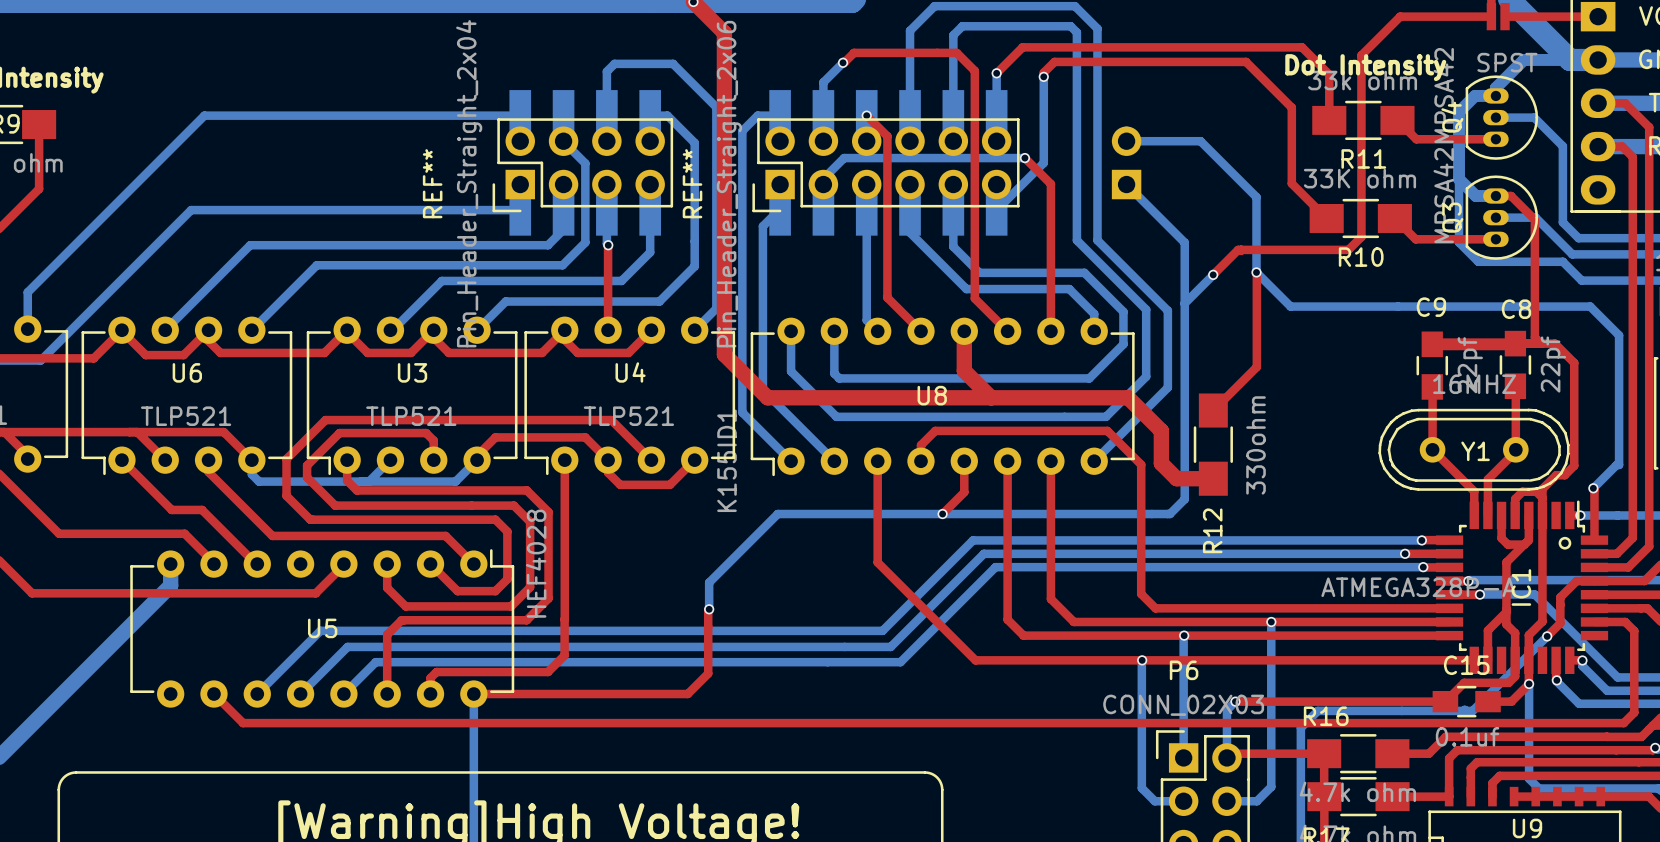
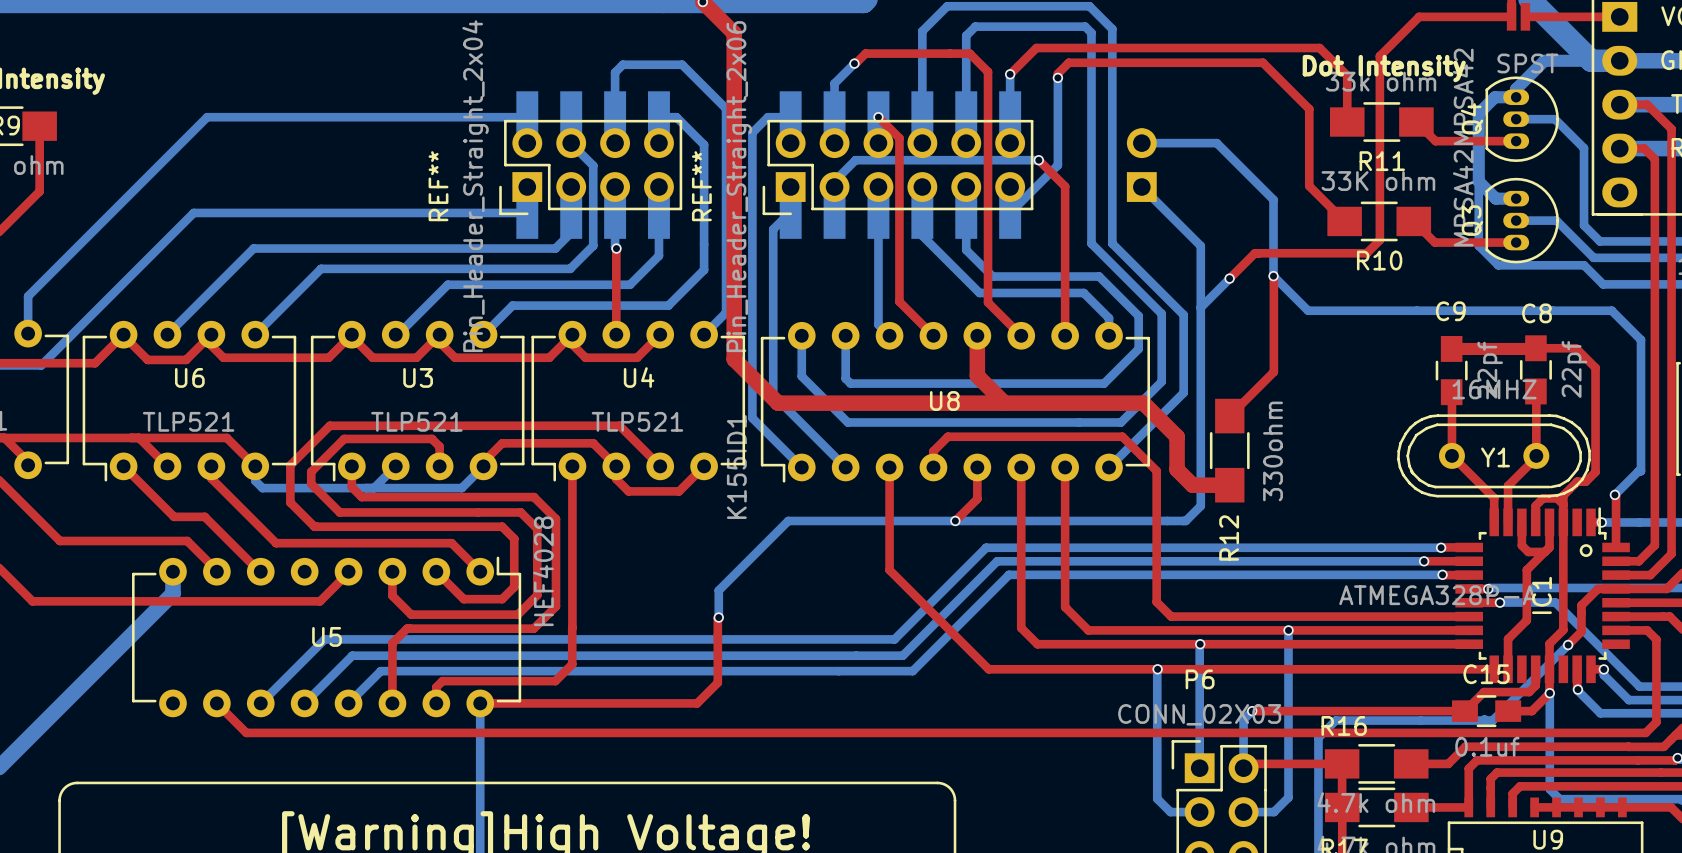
top track: (1495, 196) (1511, 196) (1534, 219) (1534, 337) (1540, 343) -> none
top track: (1506, 612) (1506, 624) (1515, 633) (1515, 660) -> none

